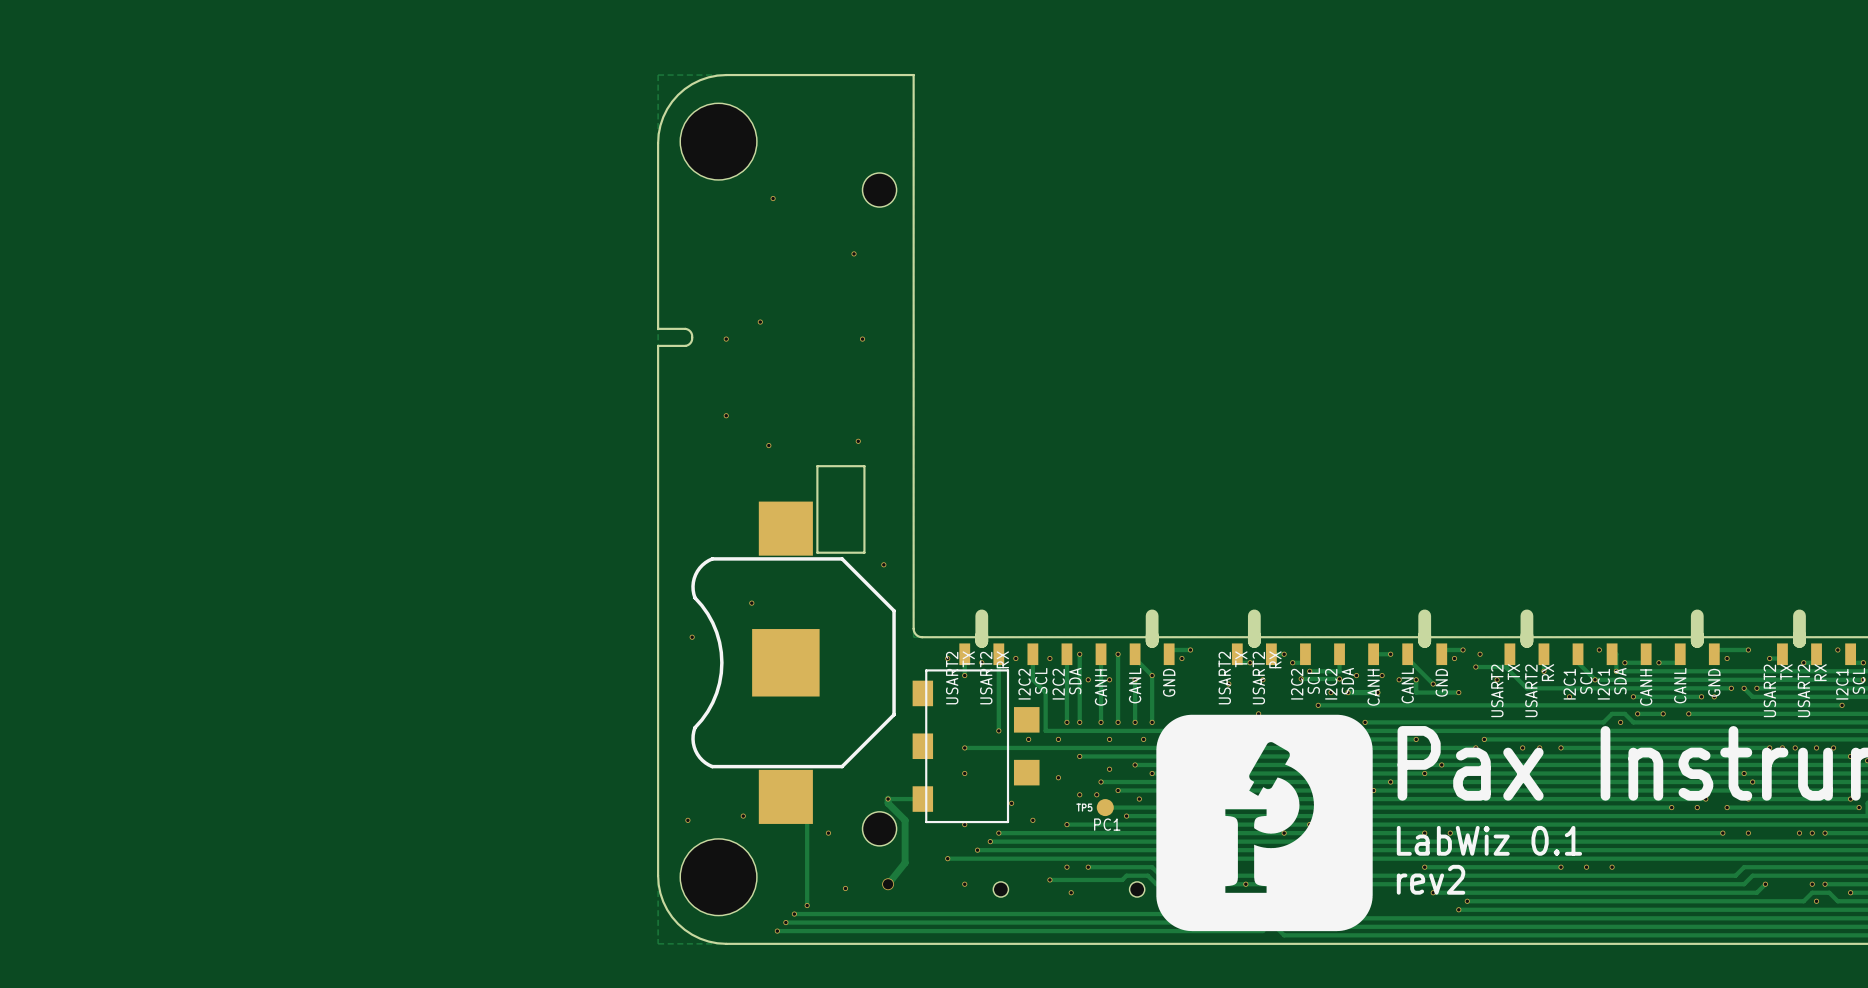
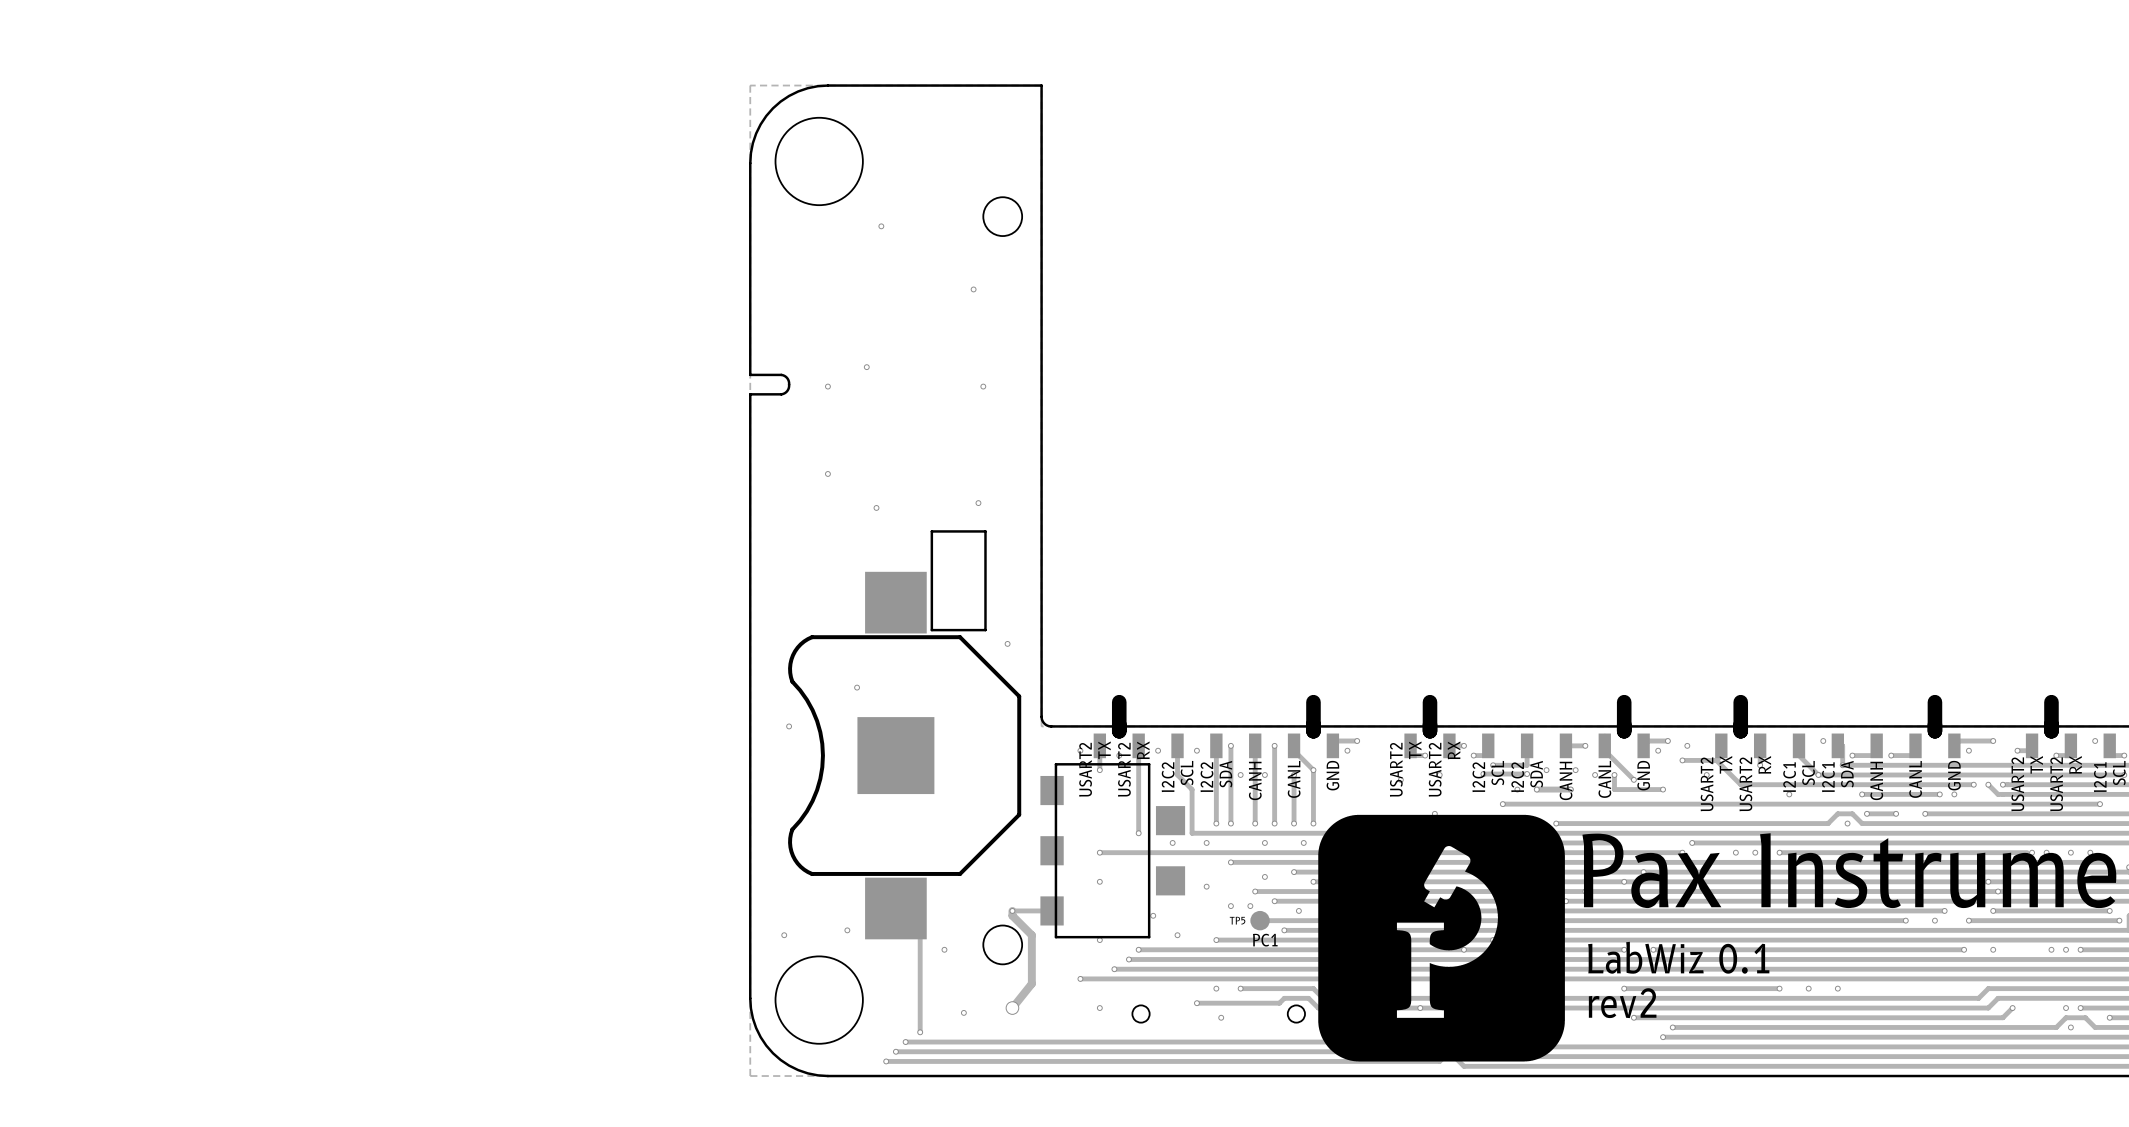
via: (1769, 747) -> none
track: none -> (2027, 852) (2017, 852)

